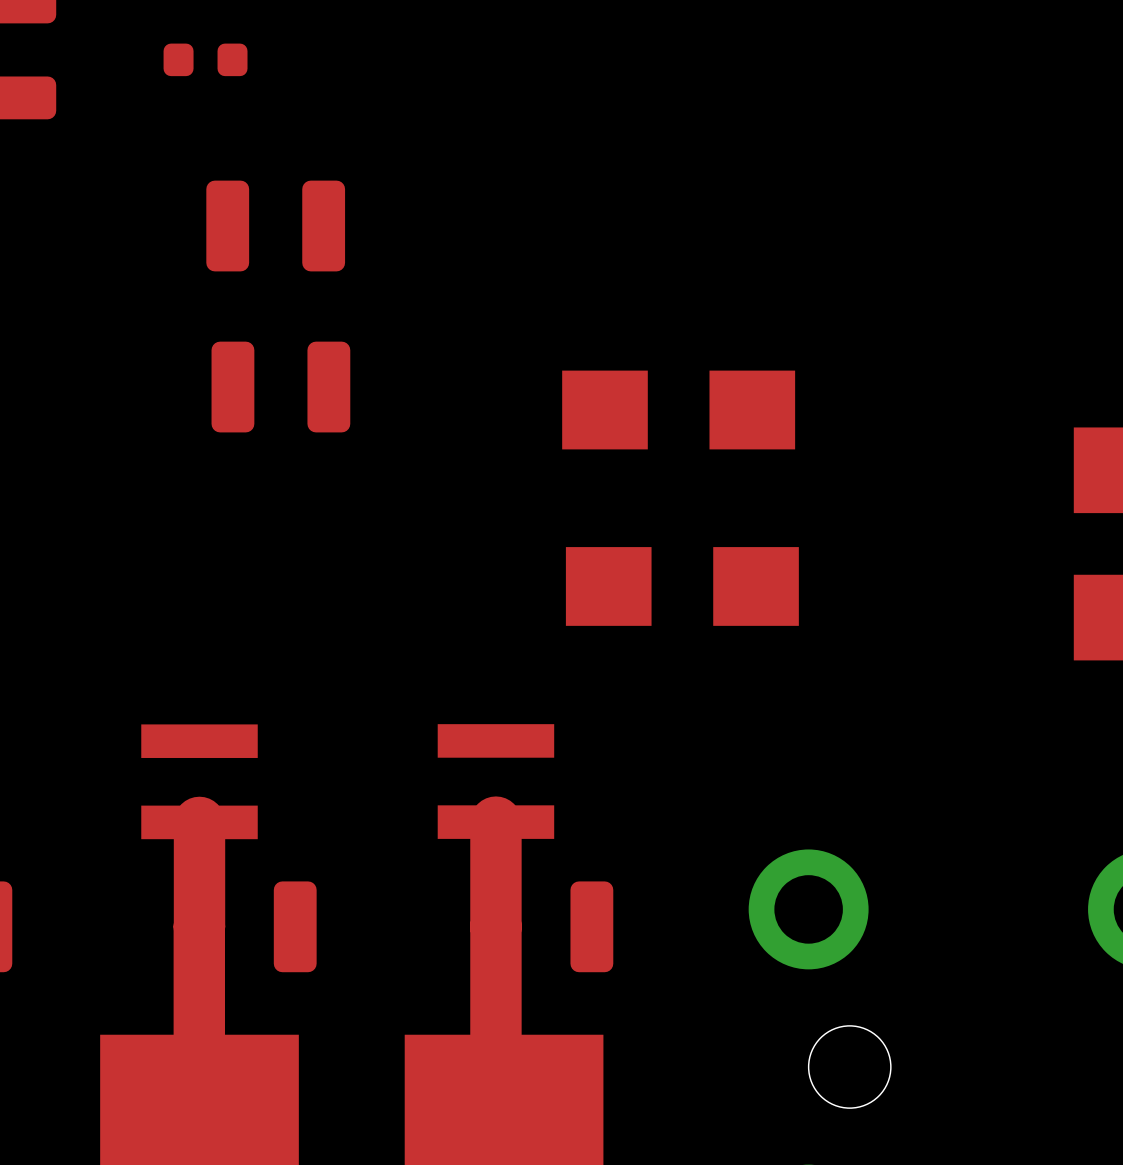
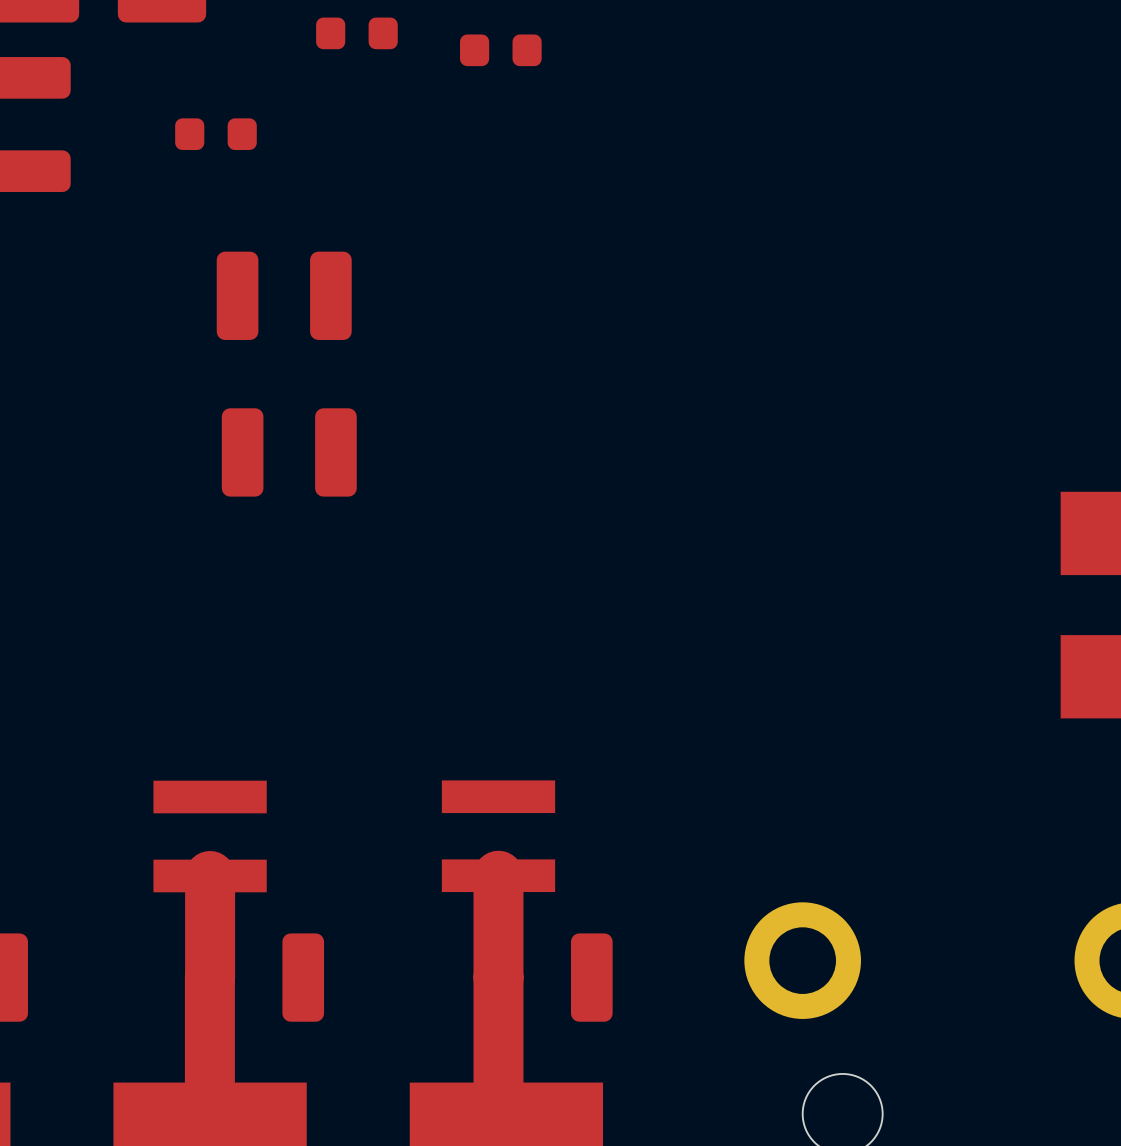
part: (678, 410) -> none
part: (682, 586) -> none

